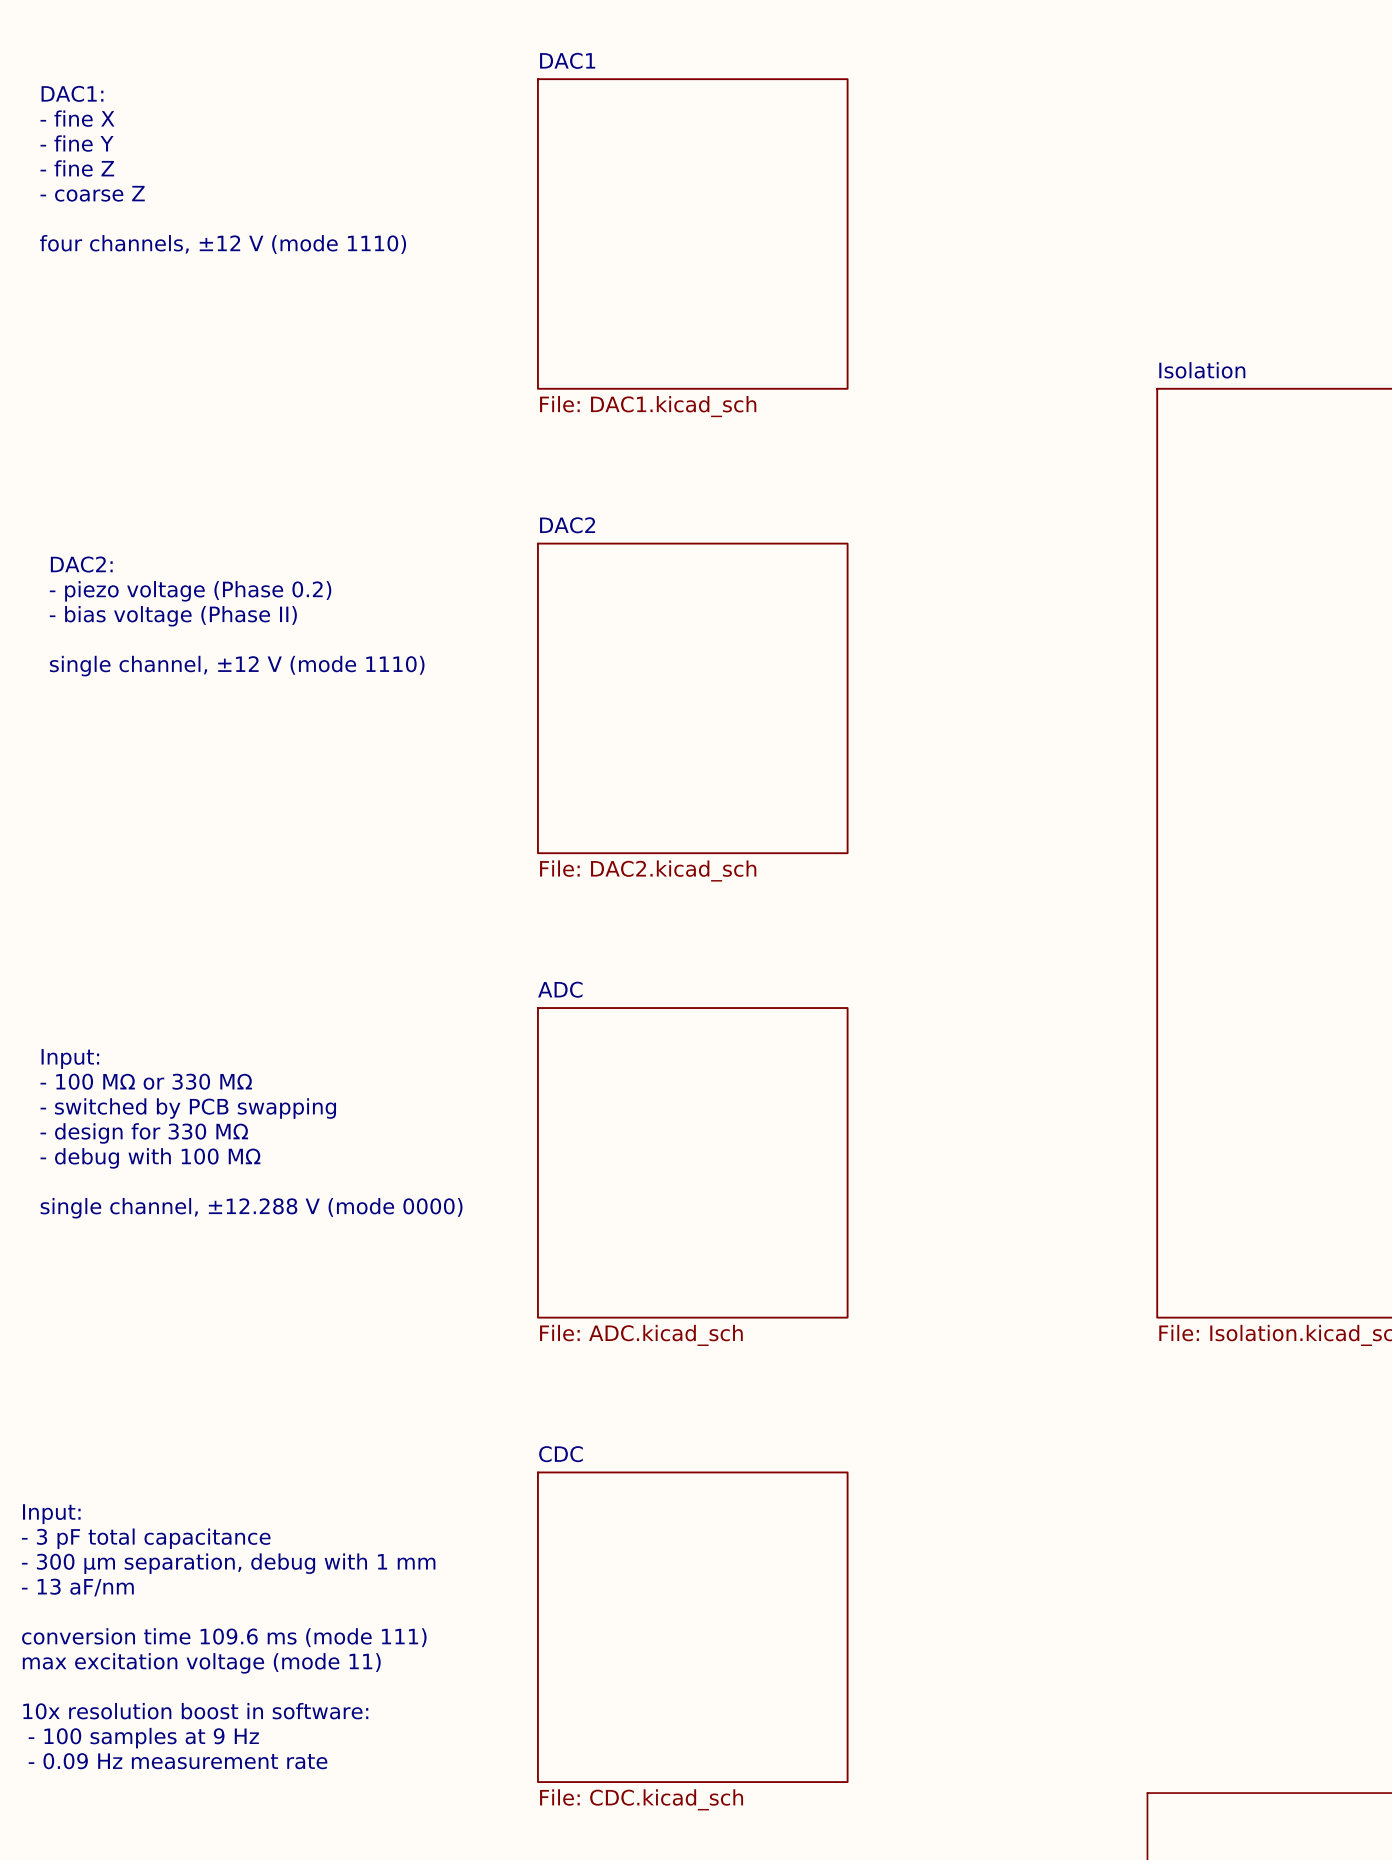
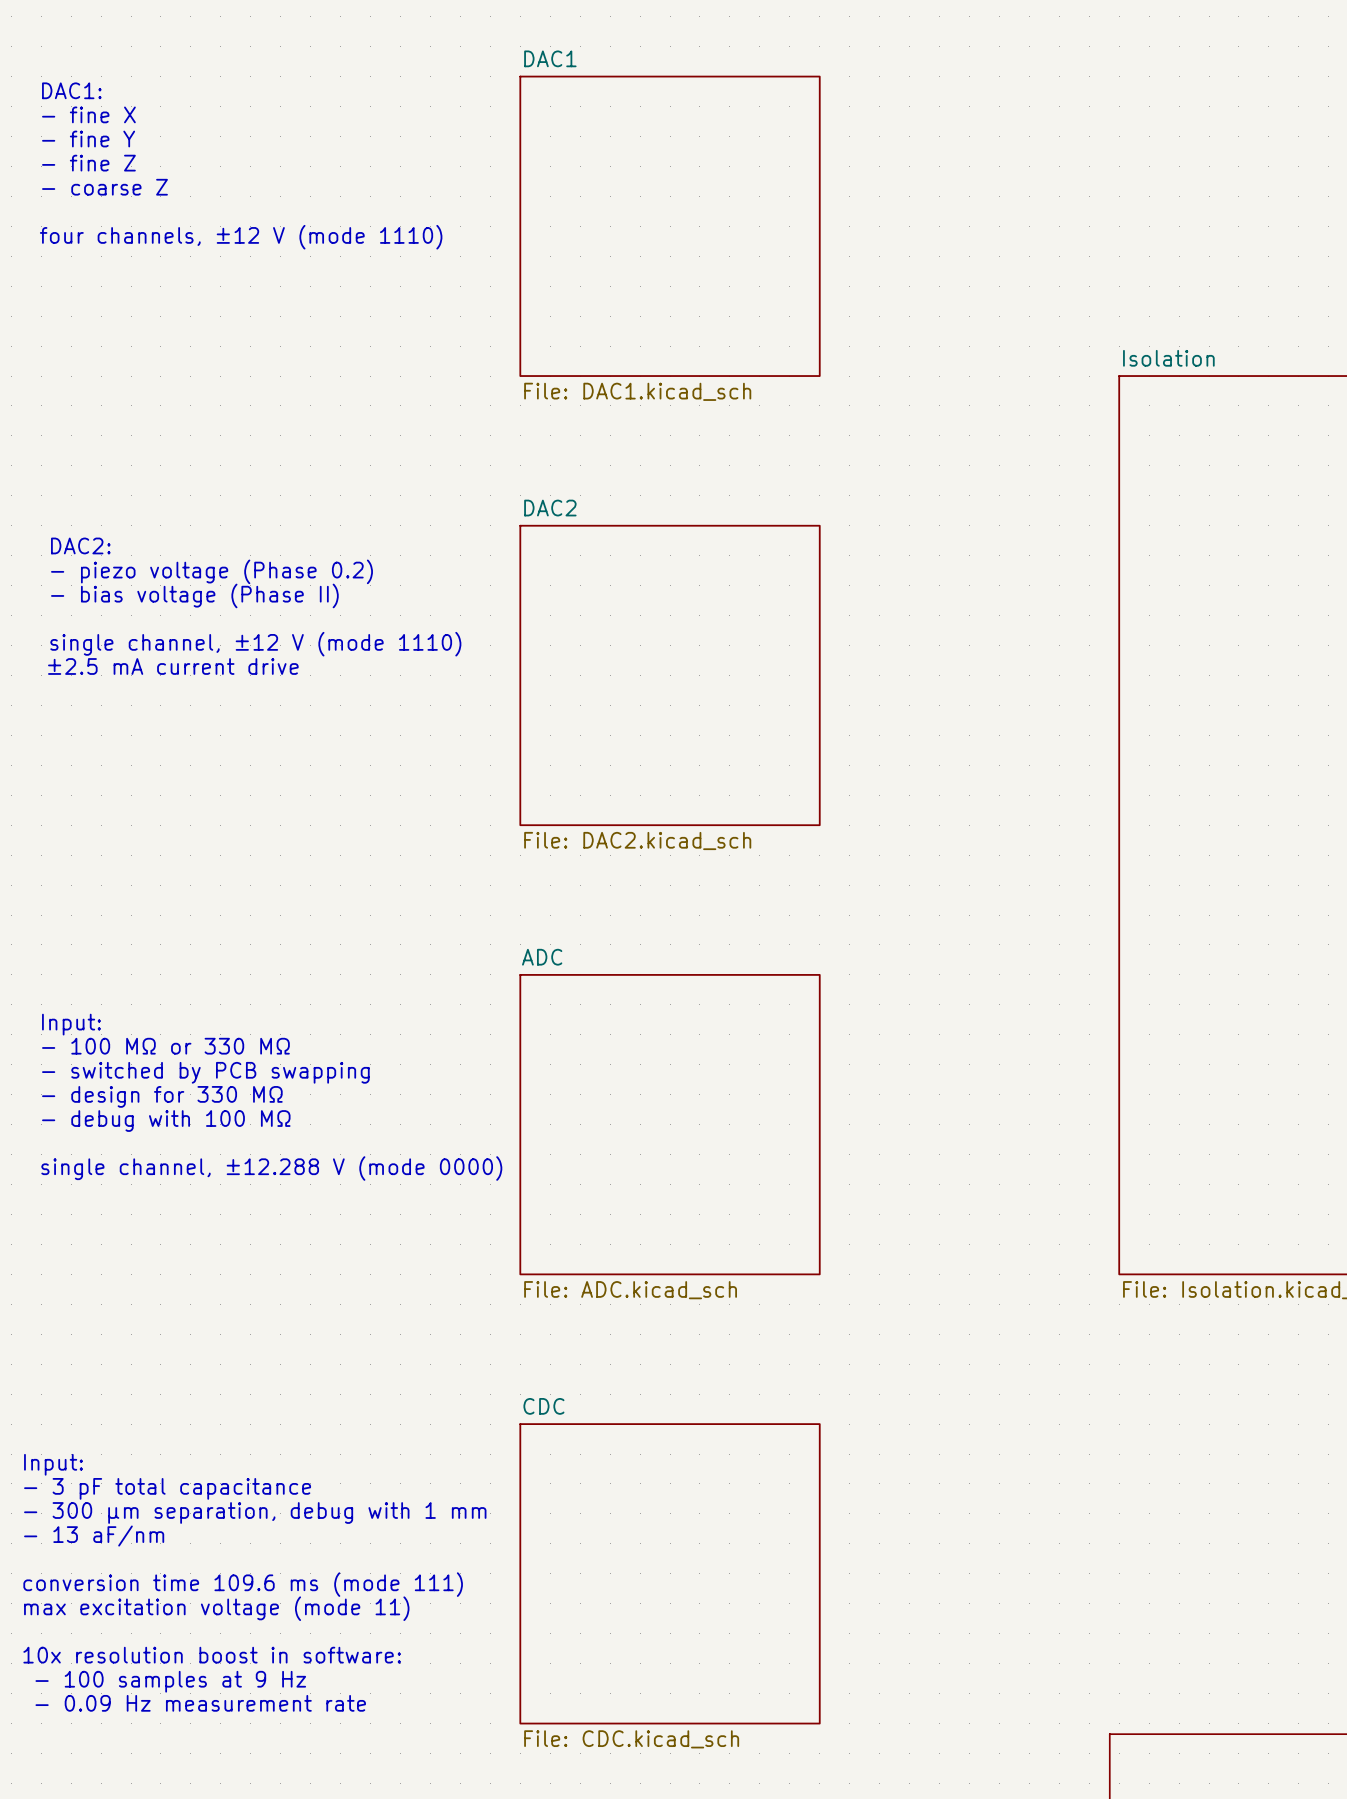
text: none -> ±2.5 mA current drive (173, 666)

